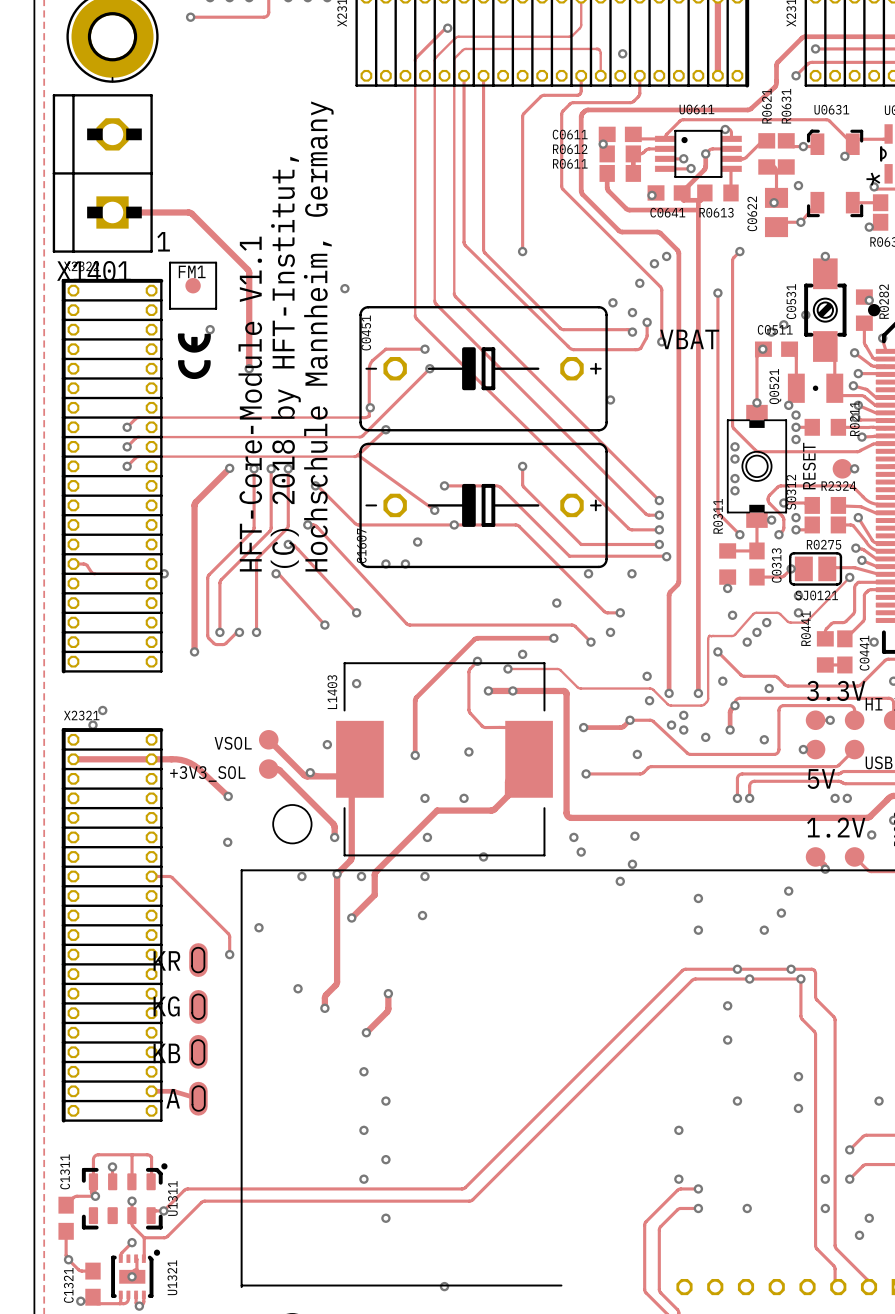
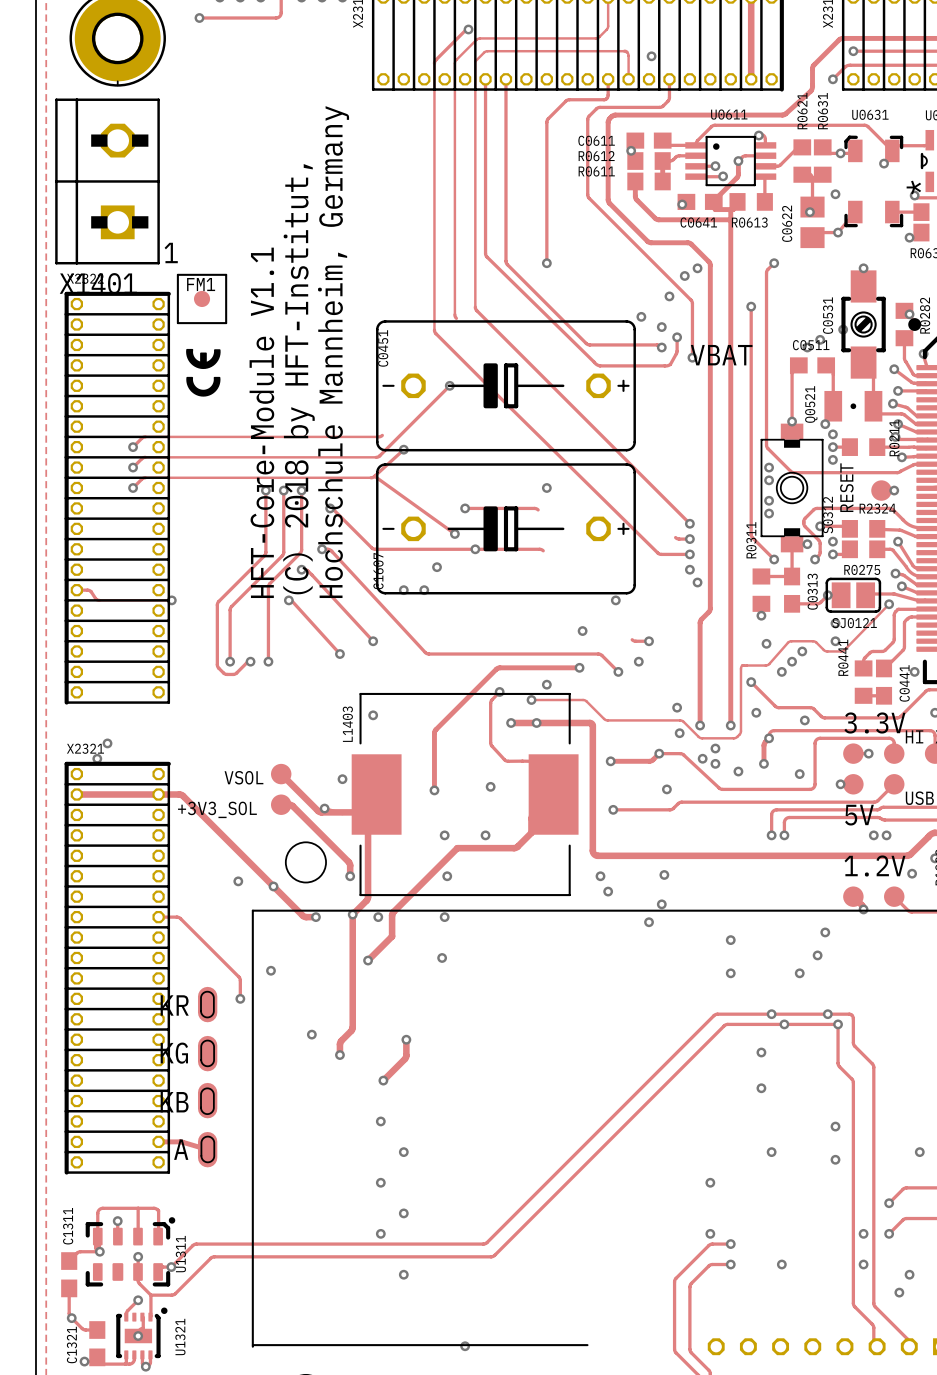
track: (112, 212) (190, 212) (248, 270) (249, 368) -> none
via: (344, 288) -> none
track: (436, 304) (645, 513) -> none
via: (210, 329) -> none
via: (424, 349) -> none
via: (762, 349) -> none
track: (426, 350) (385, 349) (372, 360) (369, 368) (369, 416) (361, 417) -> (382, 435) (378, 436)
via: (249, 368) -> none
via: (610, 399) -> none
via: (370, 407) -> none
track: (522, 466) (523, 486) (581, 544) (659, 544) -> none
track: (229, 468) (194, 504) (194, 651) -> none
via: (229, 468) -> none
track: (493, 485) (500, 487) (569, 556) (666, 556) -> (516, 508) (538, 509)
track: (519, 526) (604, 611) -> none
via: (631, 573) -> none
via: (194, 651) -> none
track: (171, 759) (185, 761) (194, 765) (228, 796) -> (179, 794) (302, 915) (314, 917)
via position: (228, 796) -> (273, 886)
via: (483, 856) -> none

